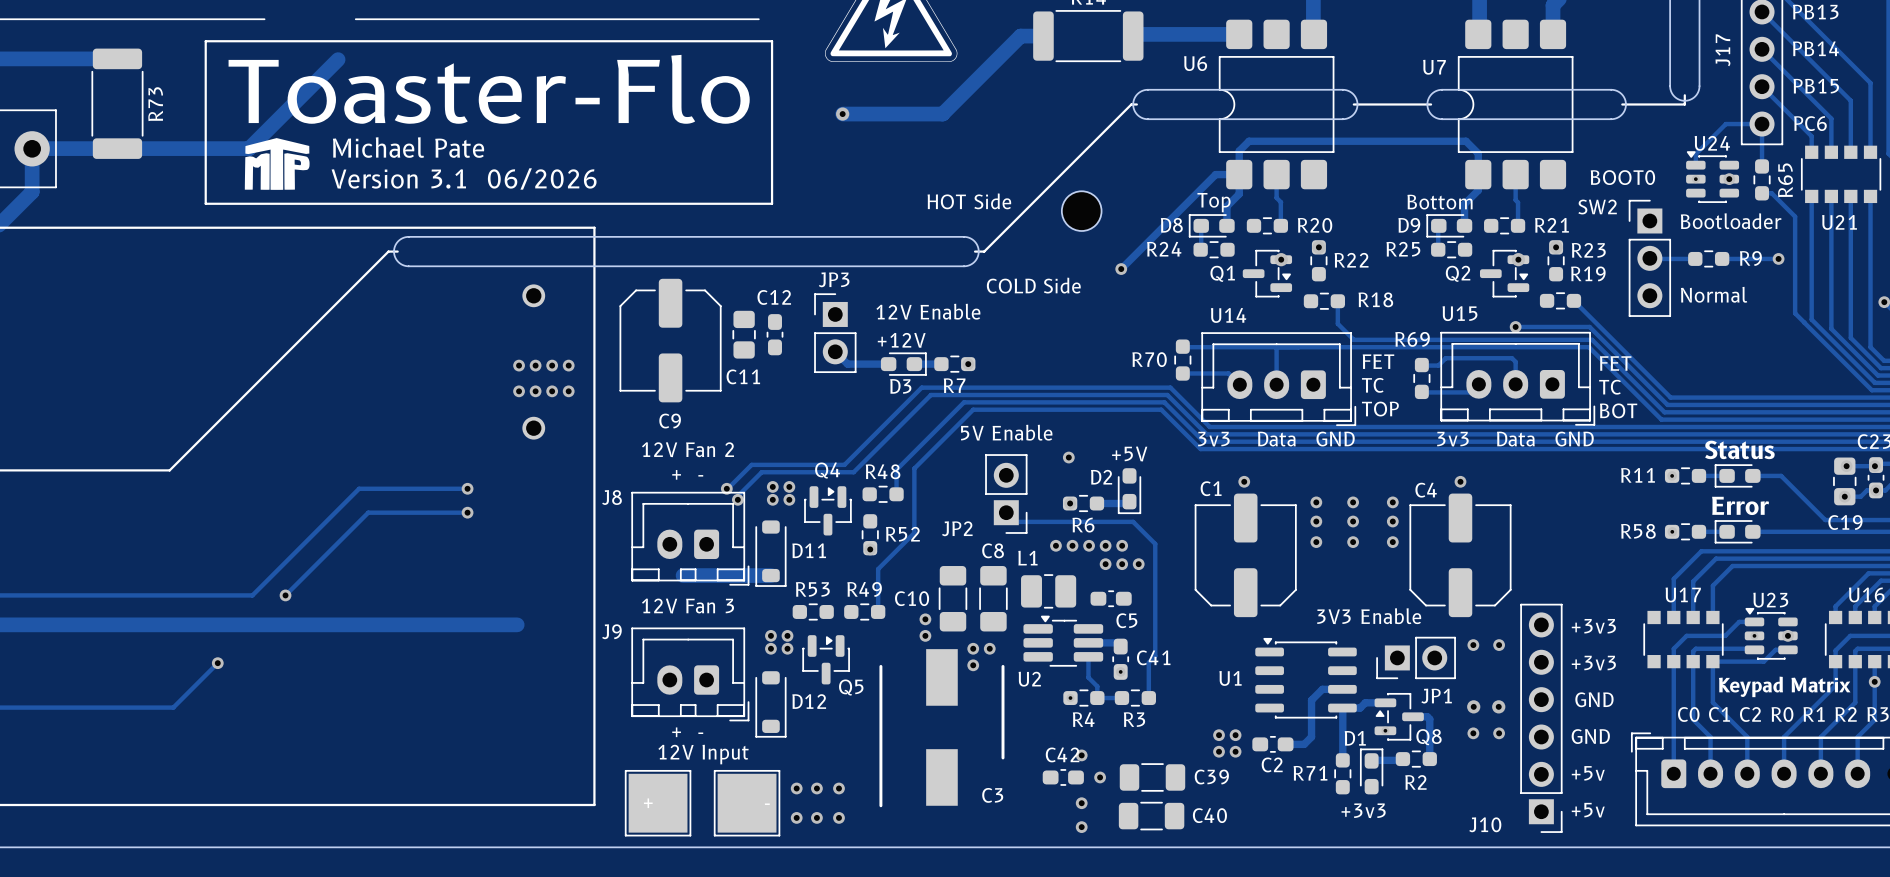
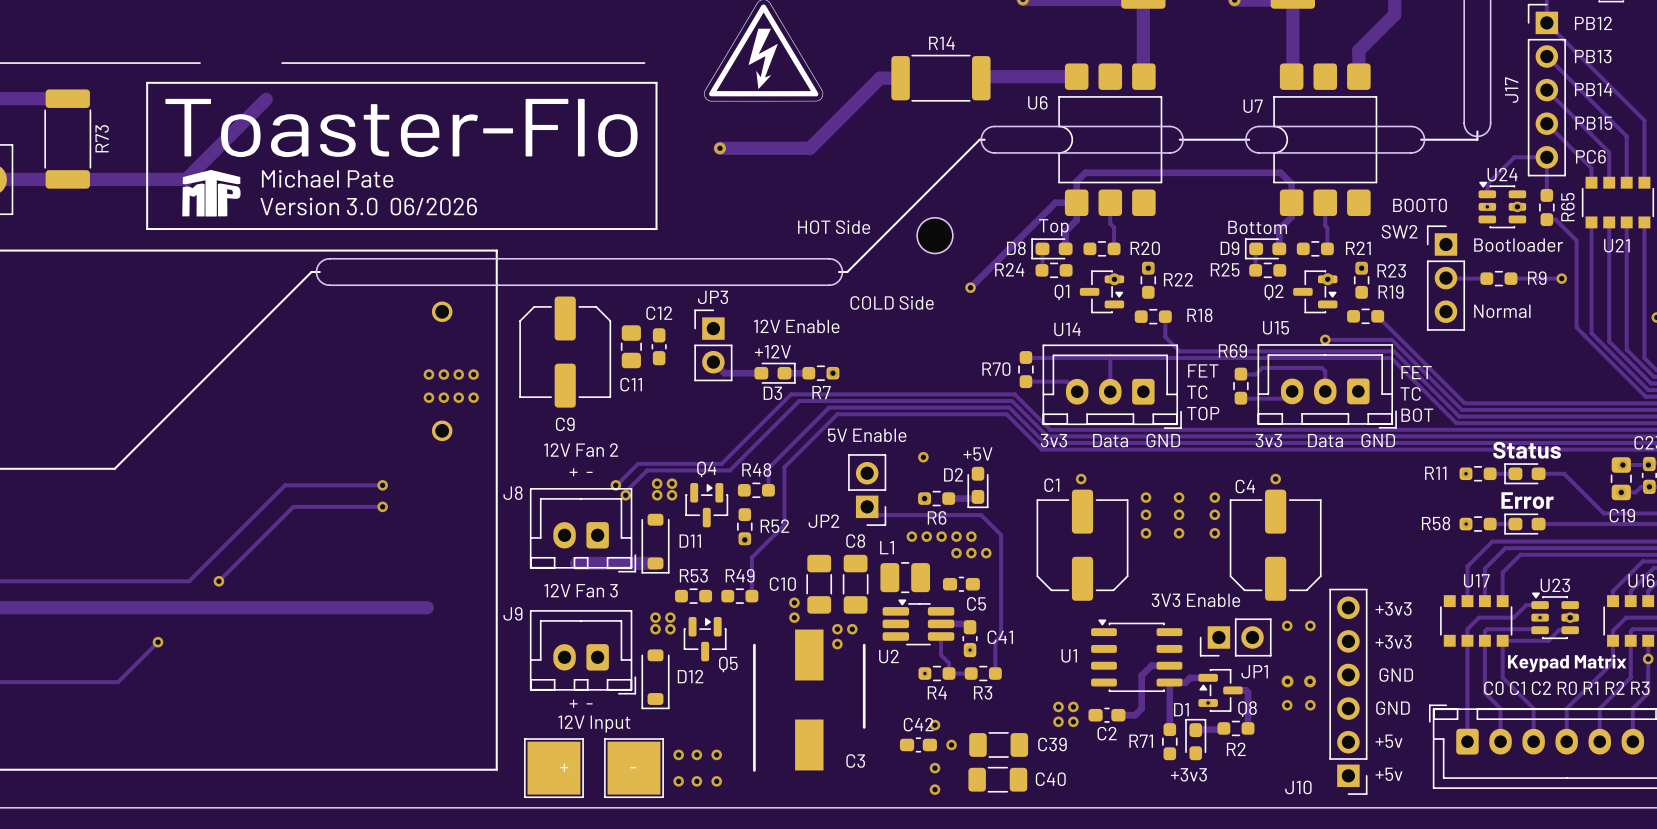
text: Version 3.1 06/2026 (464, 178) -> Version 3.0 06/2026 (368, 206)

